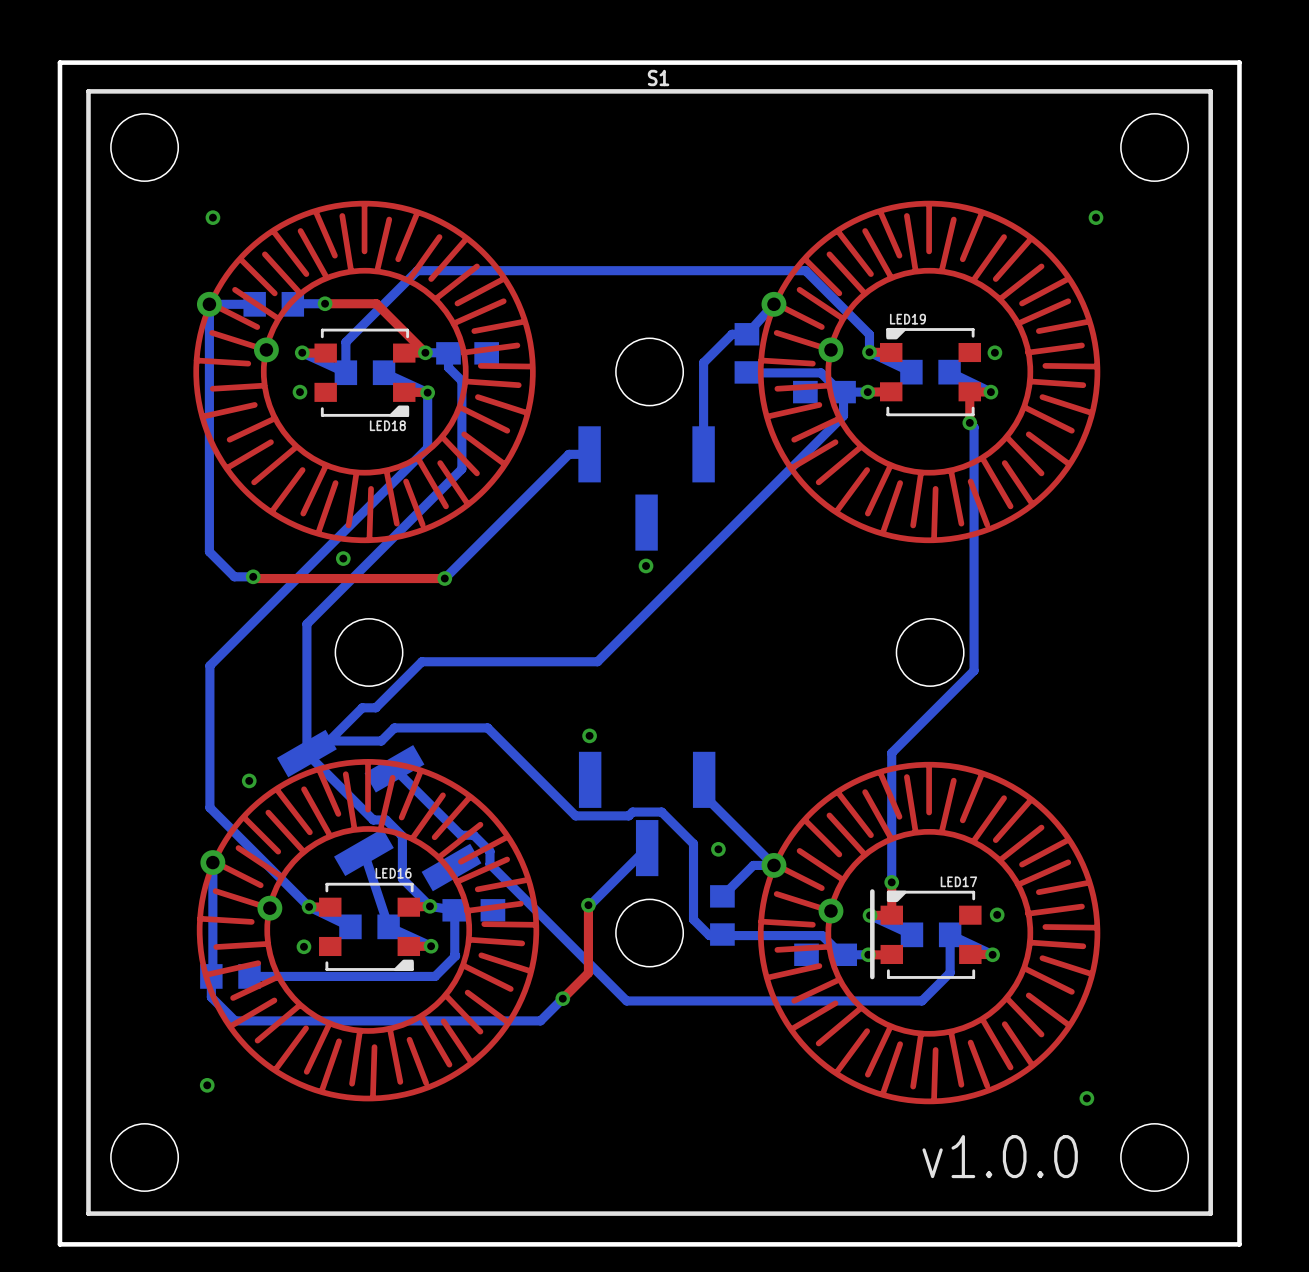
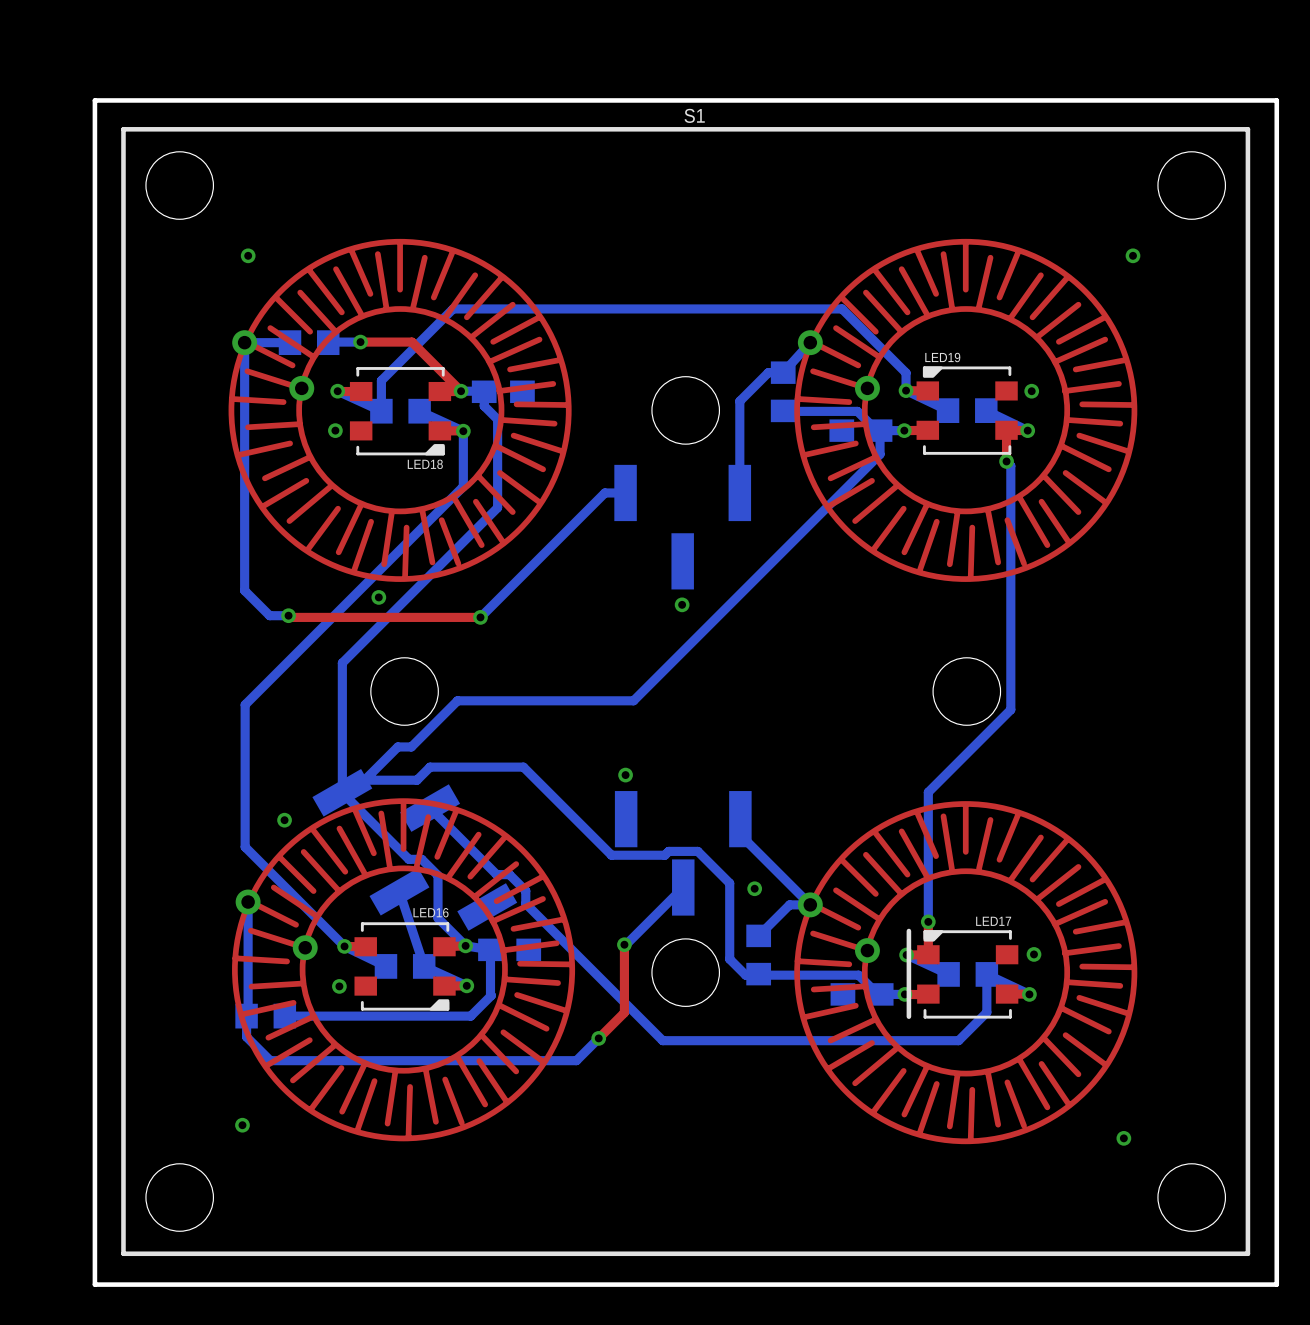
text: v1.0.0 (1000, 1156) -> none

